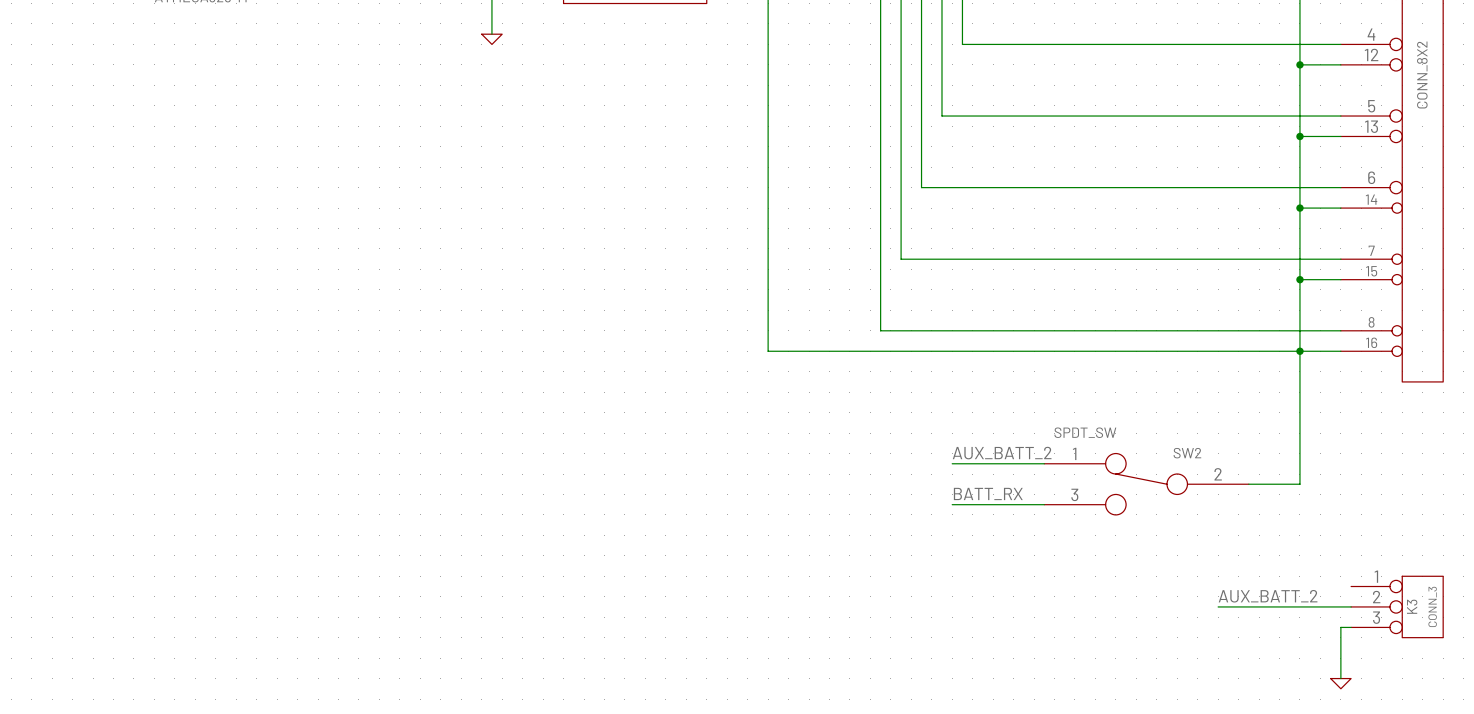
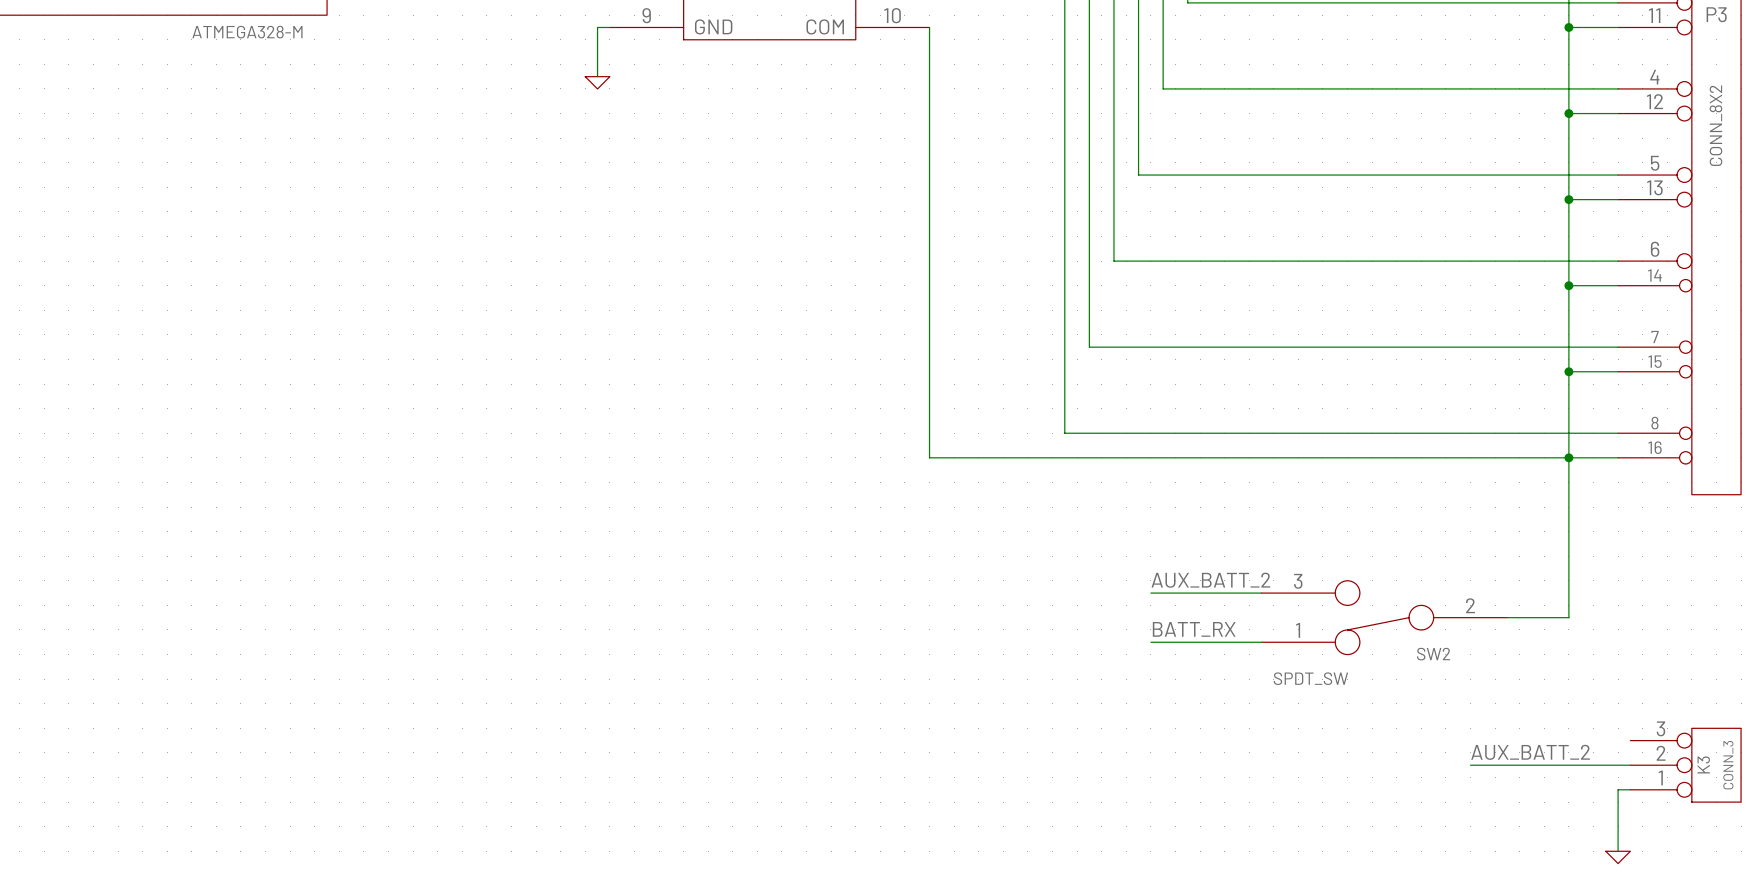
SW2 flip: as is (1146, 484) -> up-down (1384, 617)
K3 flip: as is (1422, 606) -> up-down (1716, 765)

